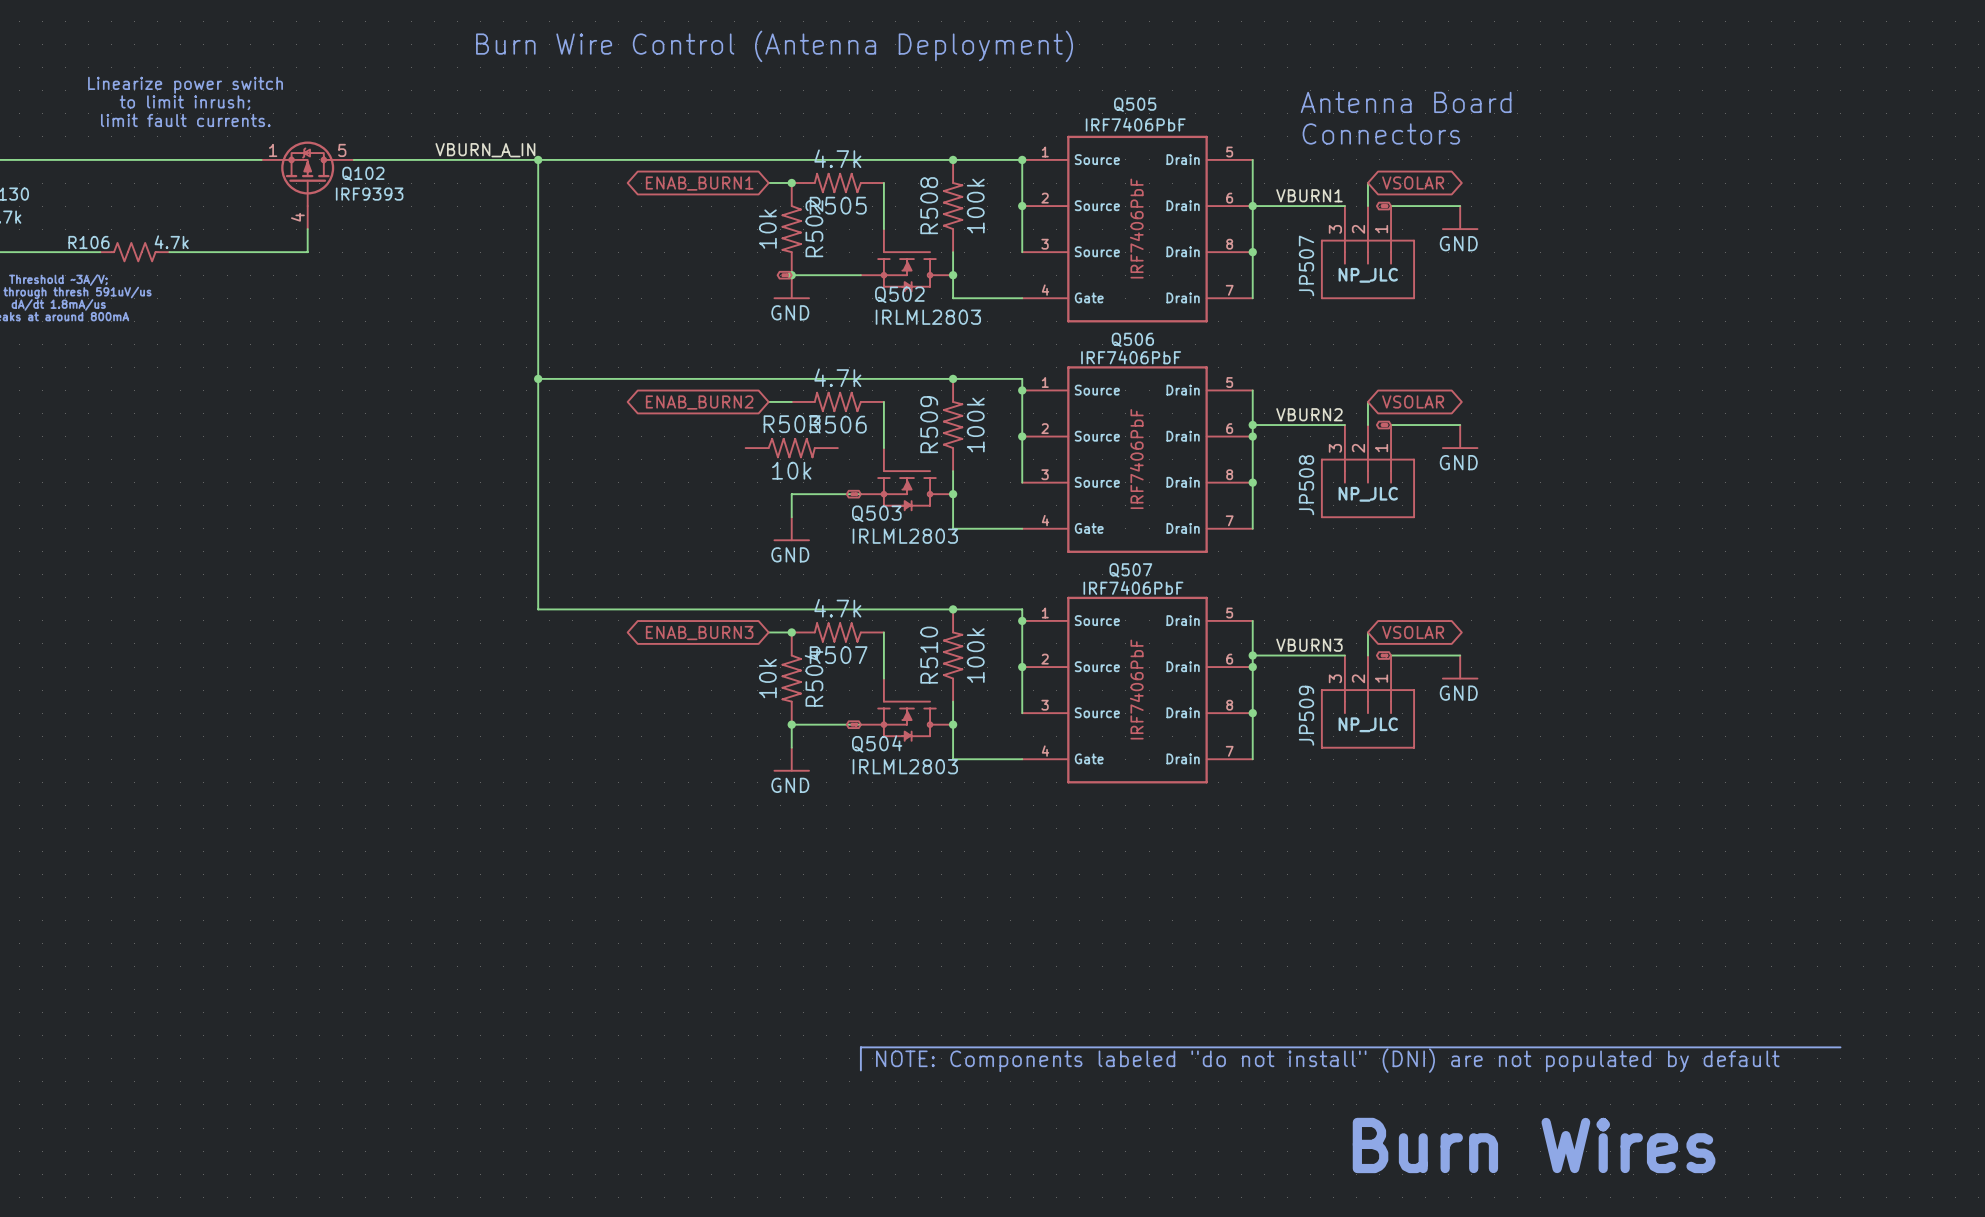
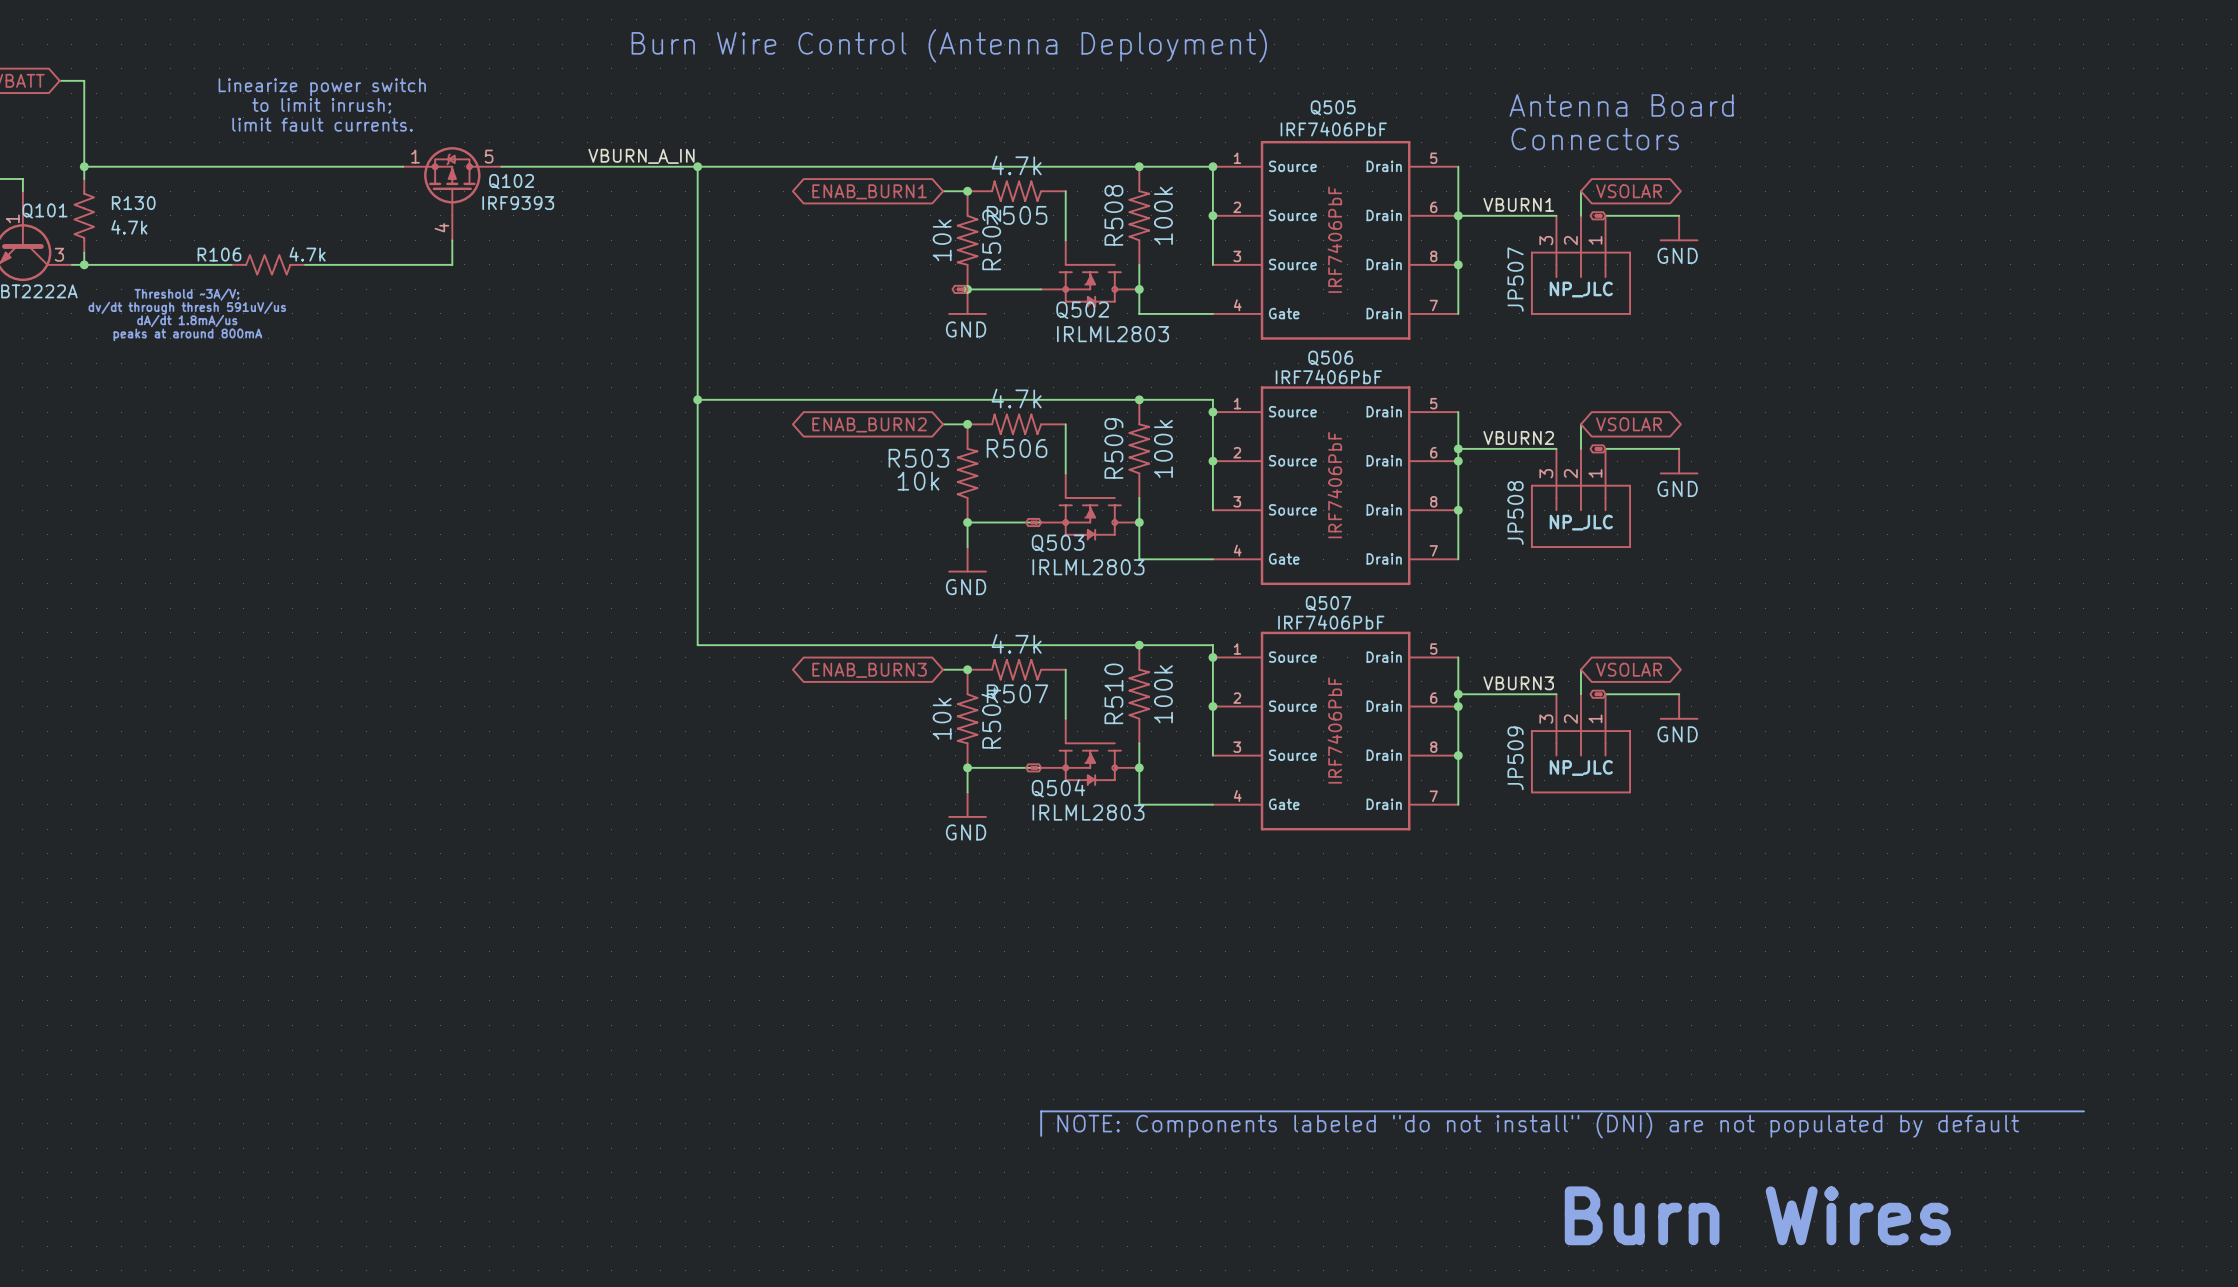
junction: none -> (967, 424)
R503 name position: R503 (792, 424) -> R503 (918, 458)
R503 rotation: 0° (791, 448) -> 90° counterclockwise (967, 473)
R503 value position: 10k (791, 470) -> 10k (918, 481)
junction: none -> (967, 522)

